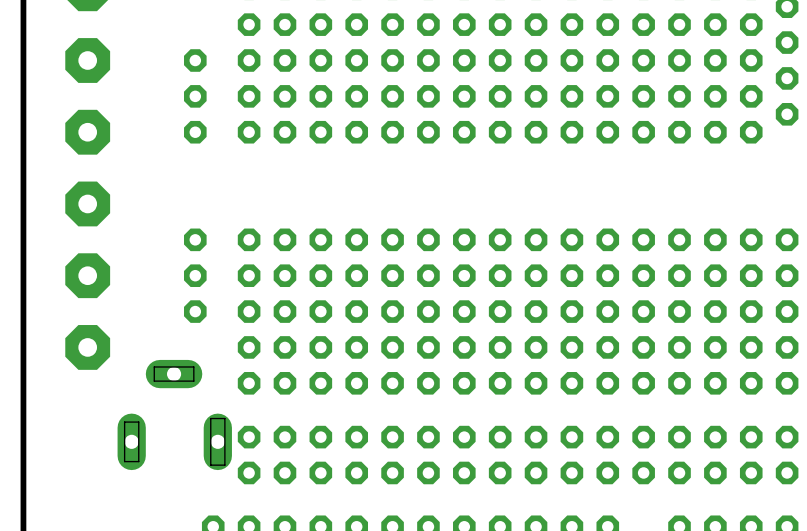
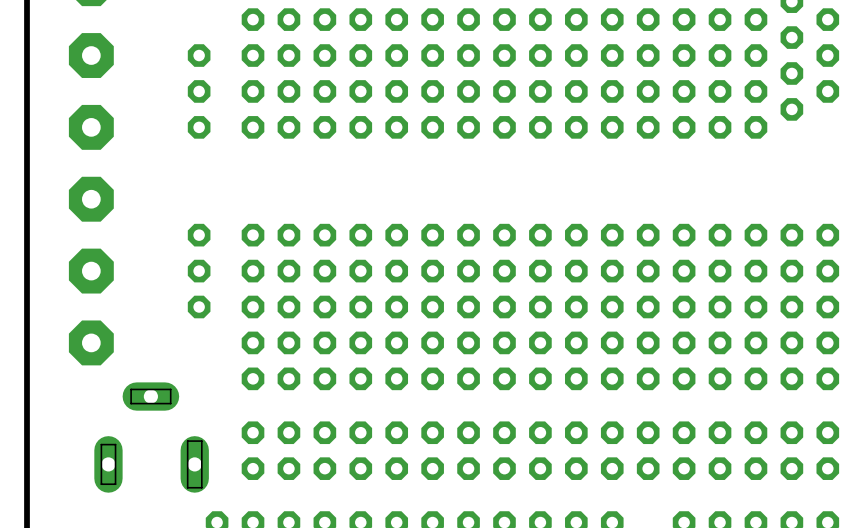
part position: (174, 415) -> (151, 437)

